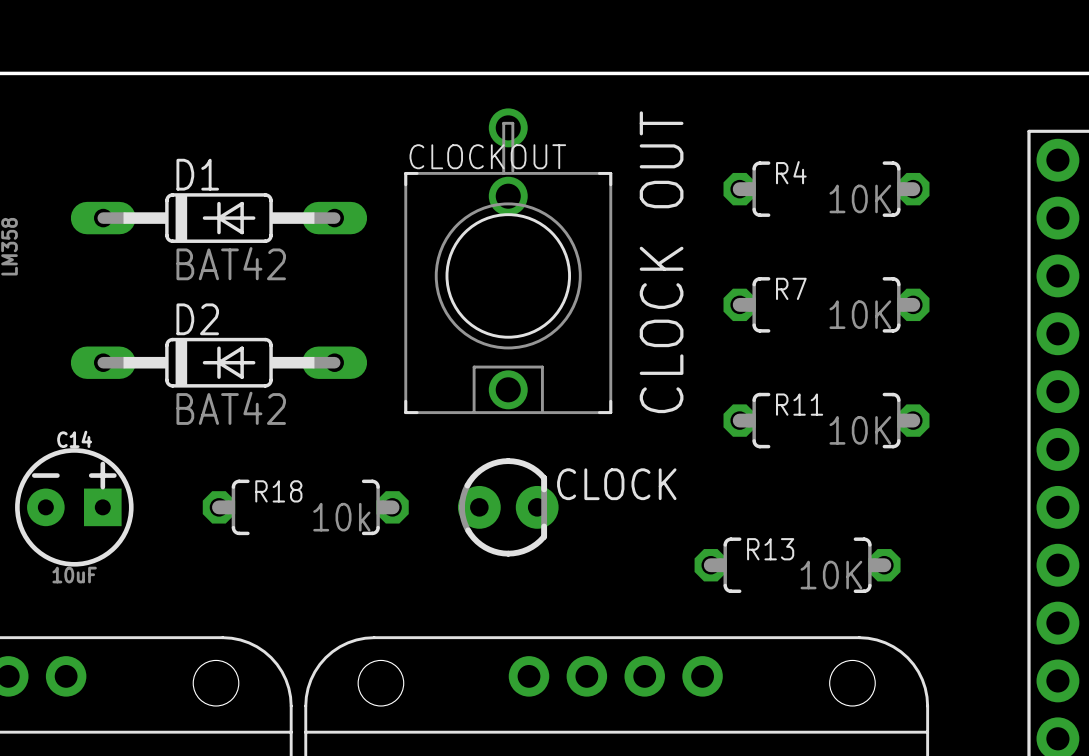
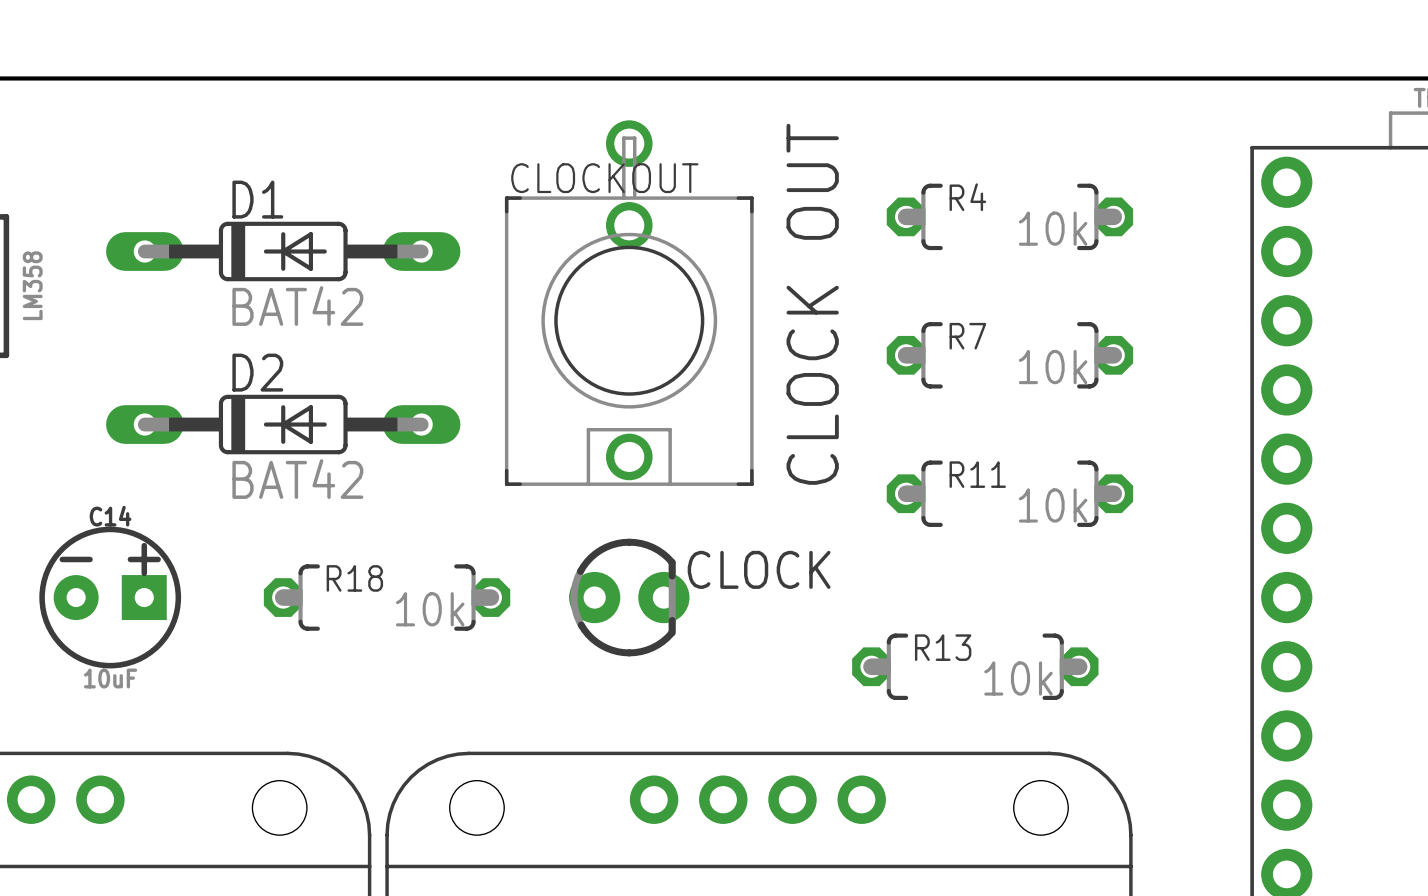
R4 value: 10K (860, 198) -> 10k (1053, 228)
R7 value: 10K (860, 314) -> 10k (1053, 367)
R11 value: 10K (860, 430) -> 10k (1053, 505)
R13 value: 10K (831, 575) -> 10k (1018, 678)

